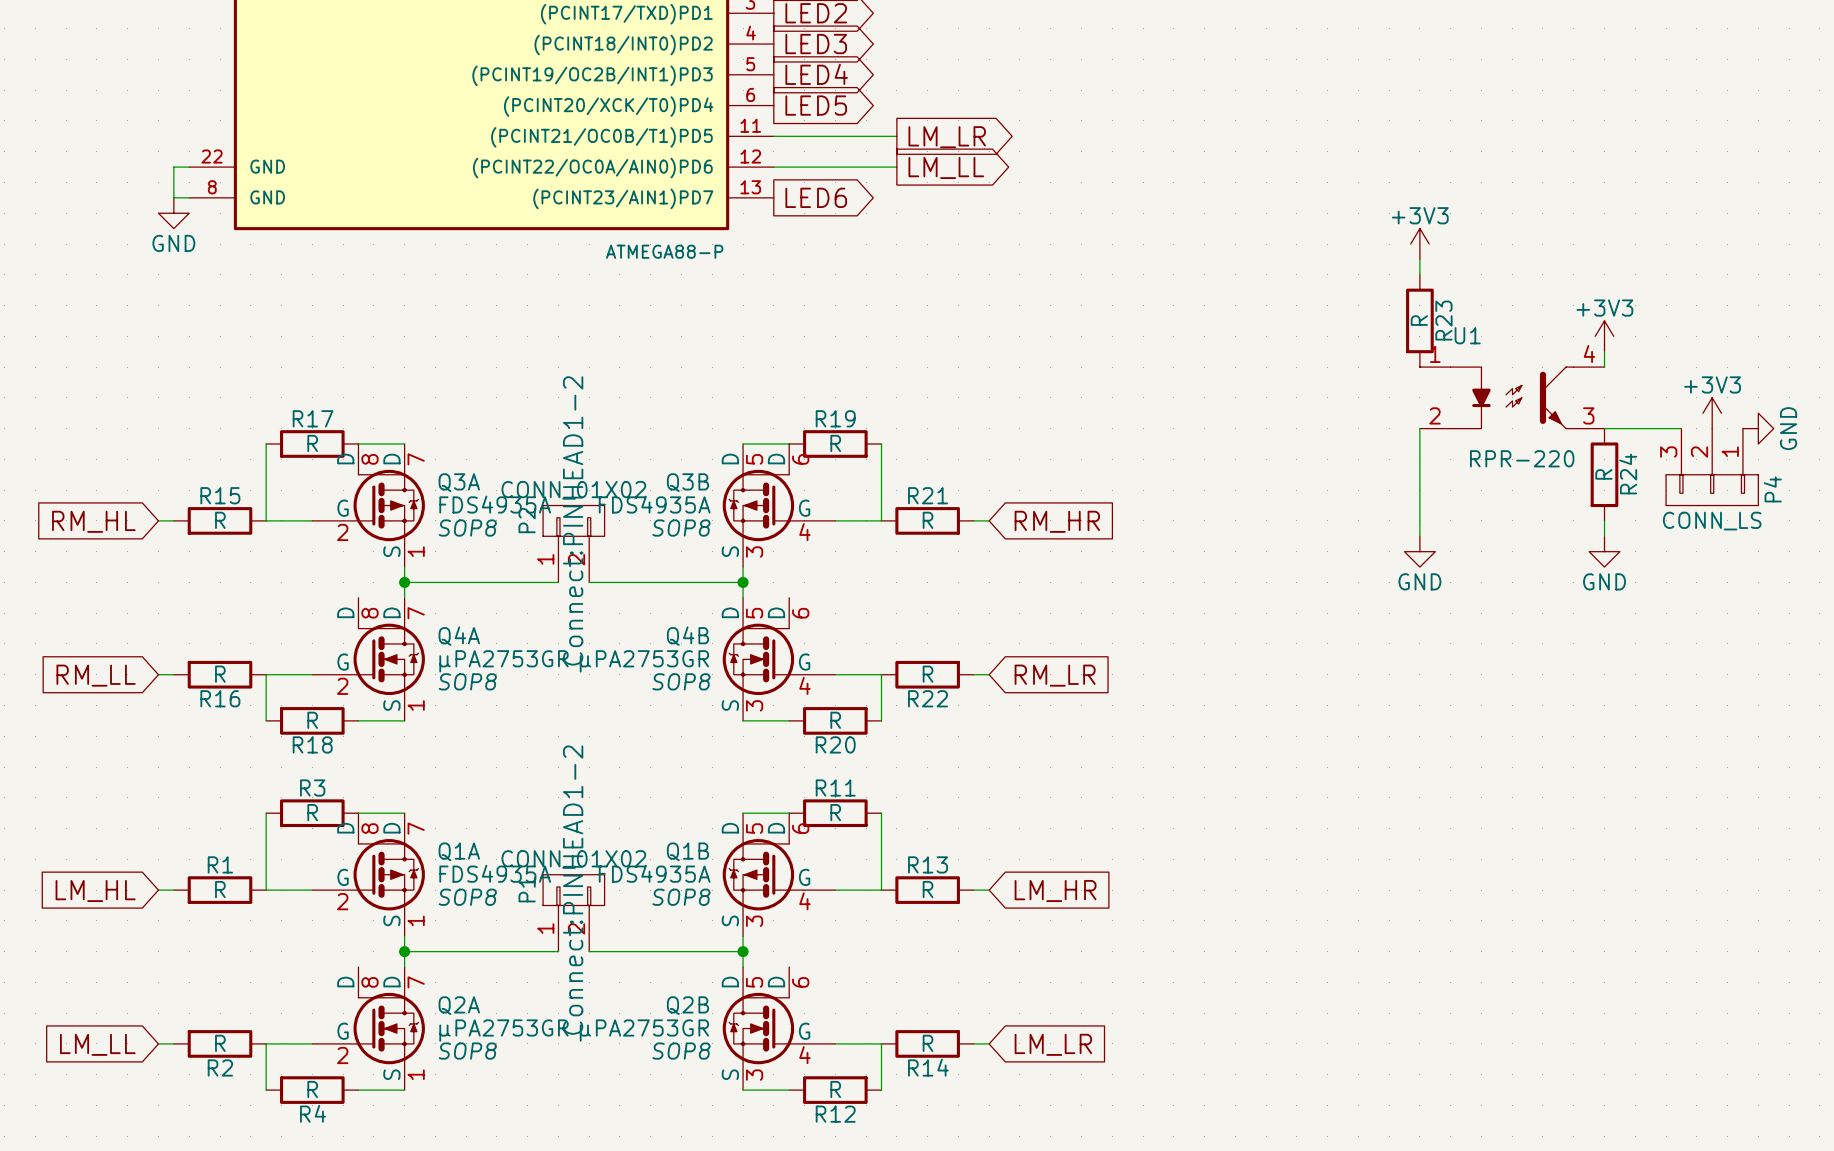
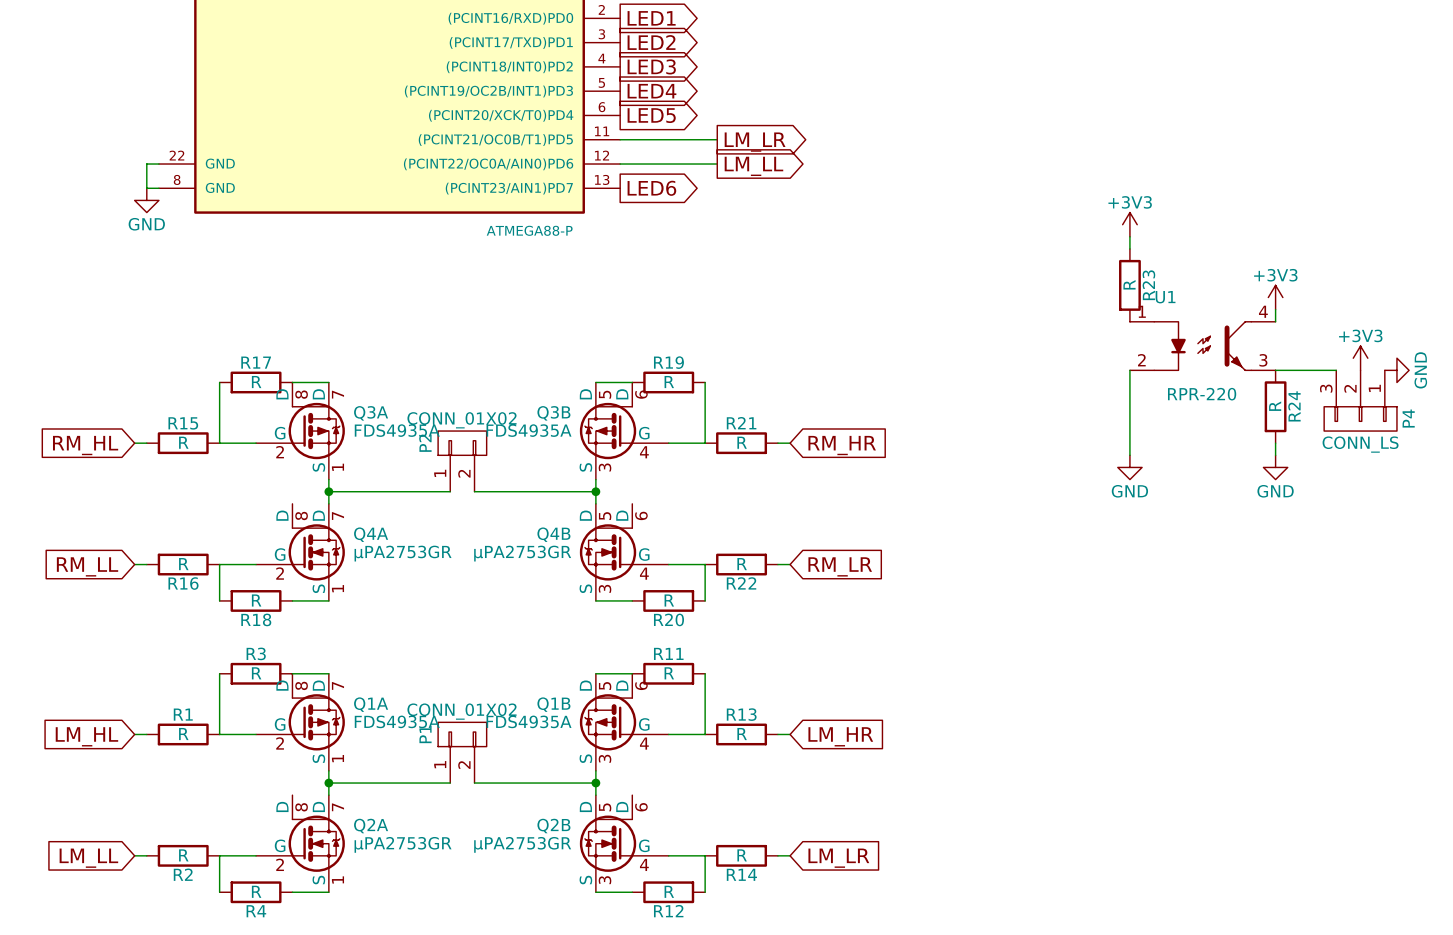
P2 text: Connect:PINHEAD1-2 (573, 520) -> none
Q3A text: SOP8 (467, 528) -> none
Q3B text: SOP8 (681, 528) -> none
Q4A text: SOP8 (467, 681) -> none
Q4B text: SOP8 (681, 681) -> none
P1 text: Connect:PINHEAD1-2 (573, 890) -> none
Q1A text: SOP8 (467, 897) -> none
Q1B text: SOP8 (681, 897) -> none
Q2A text: SOP8 (467, 1051) -> none
Q2B text: SOP8 (681, 1051) -> none

